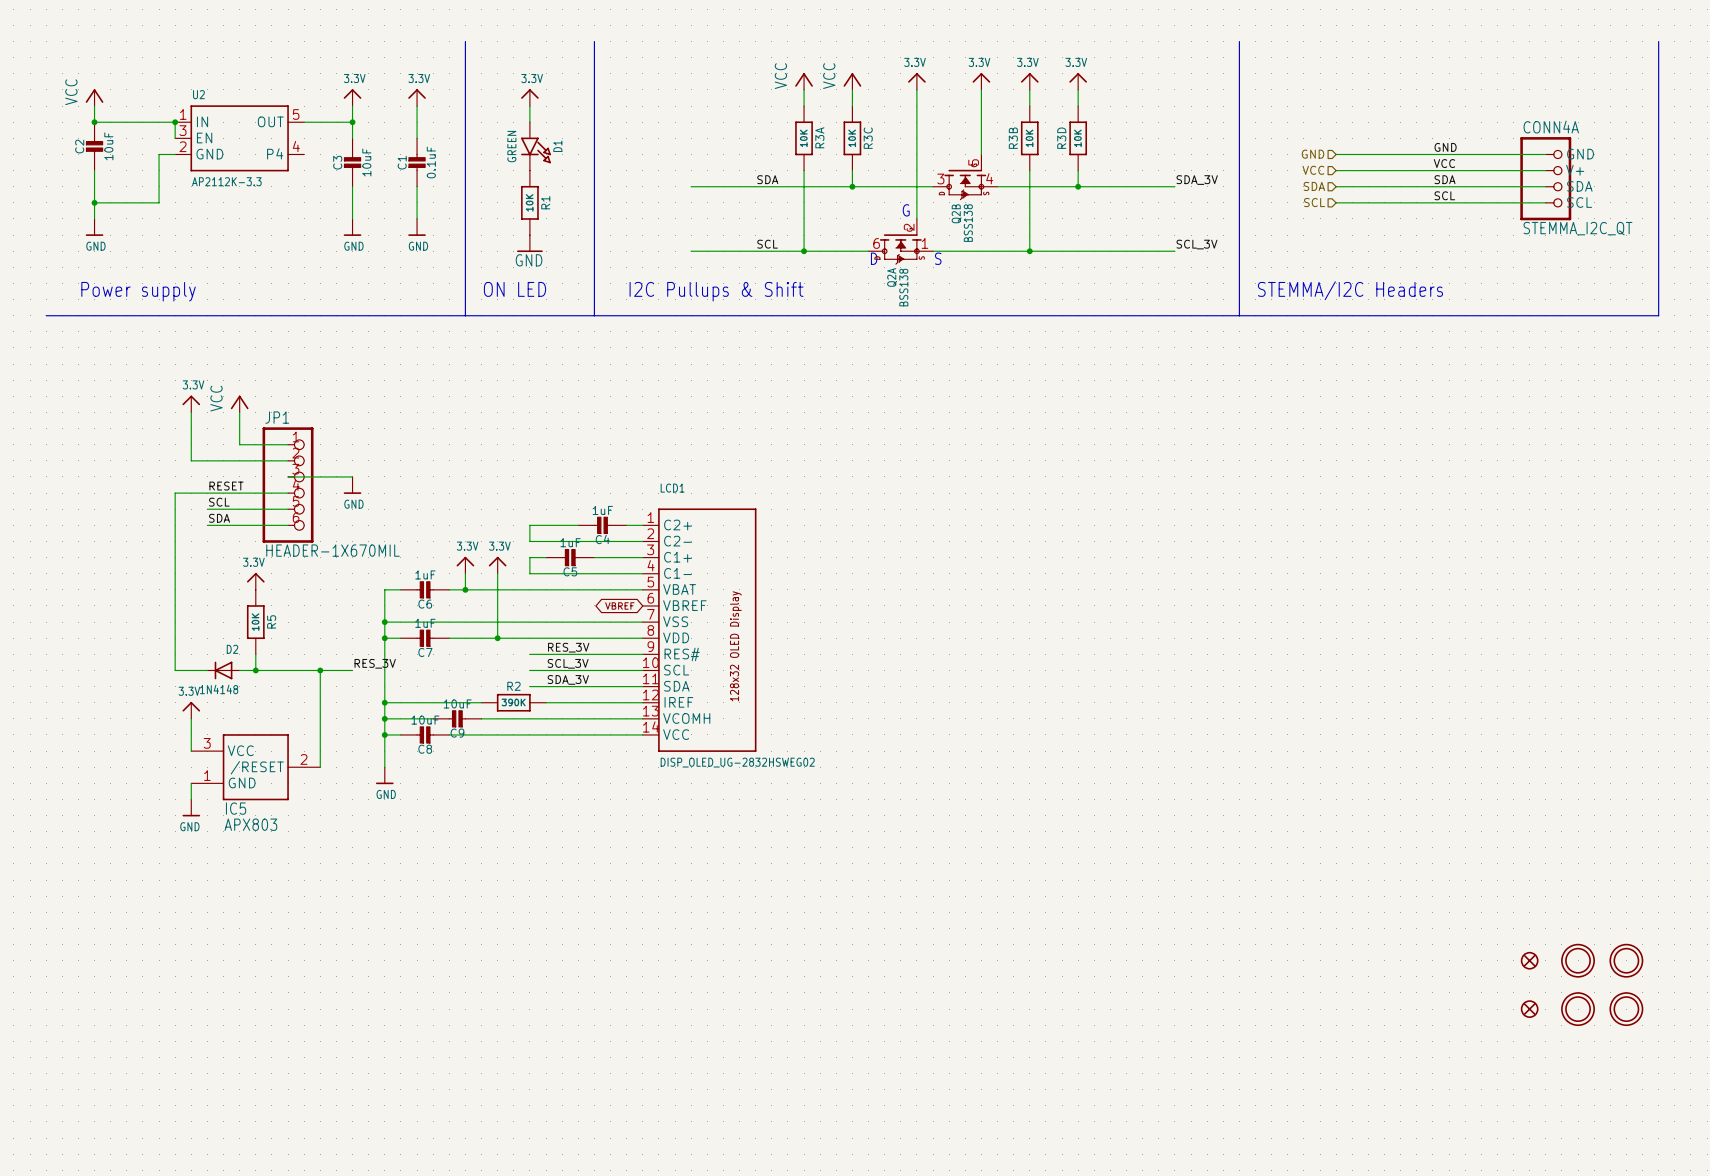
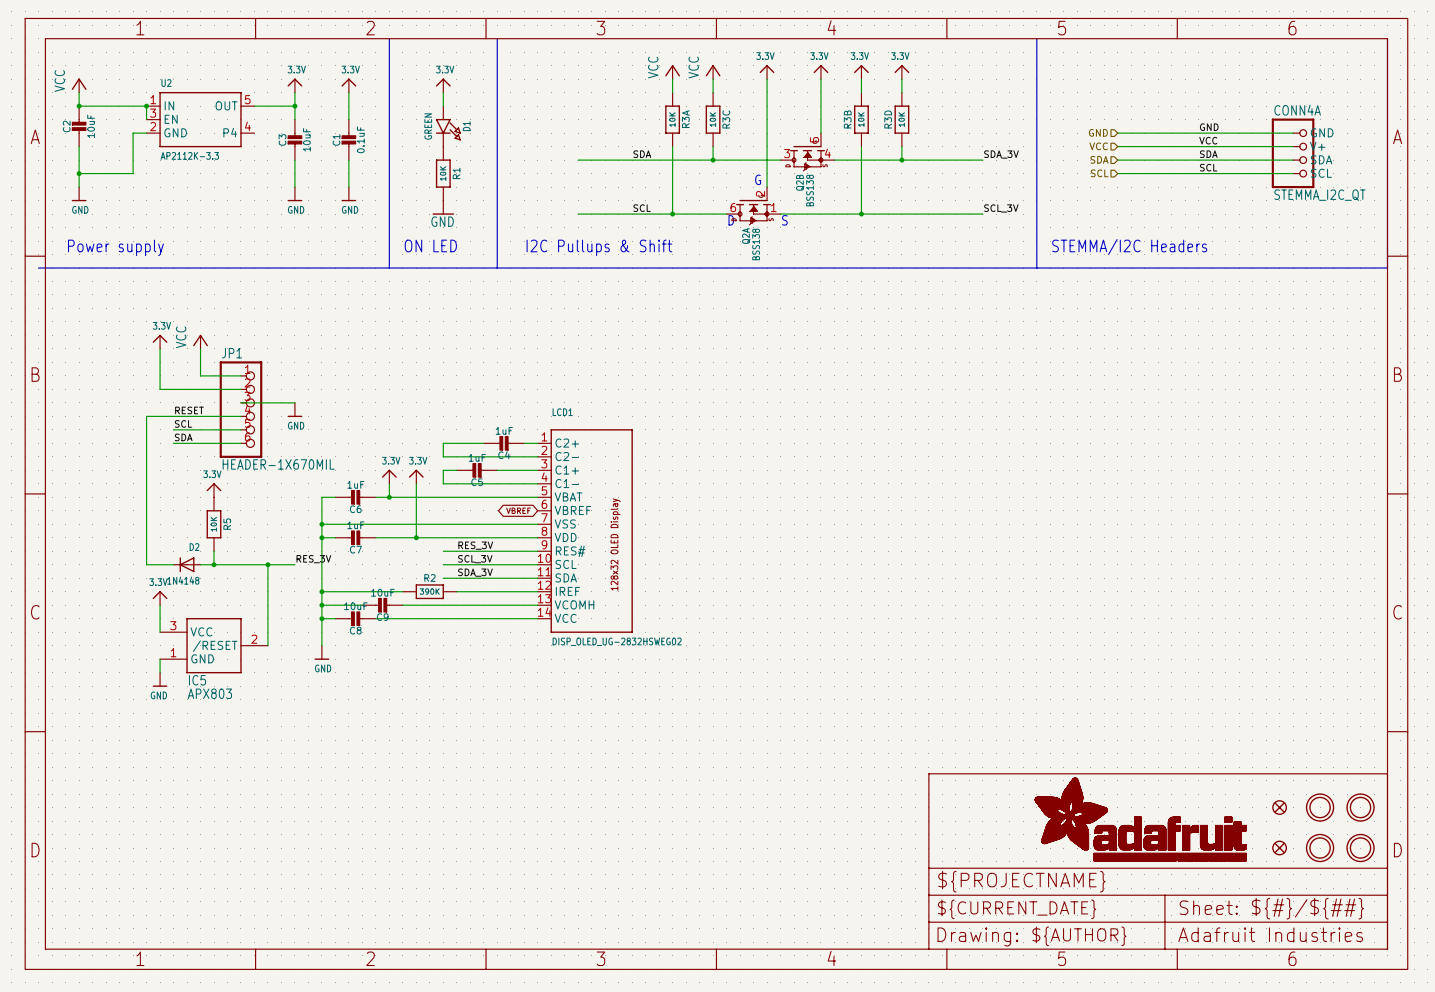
drawing: none -> [25, 18, 1408, 970]

